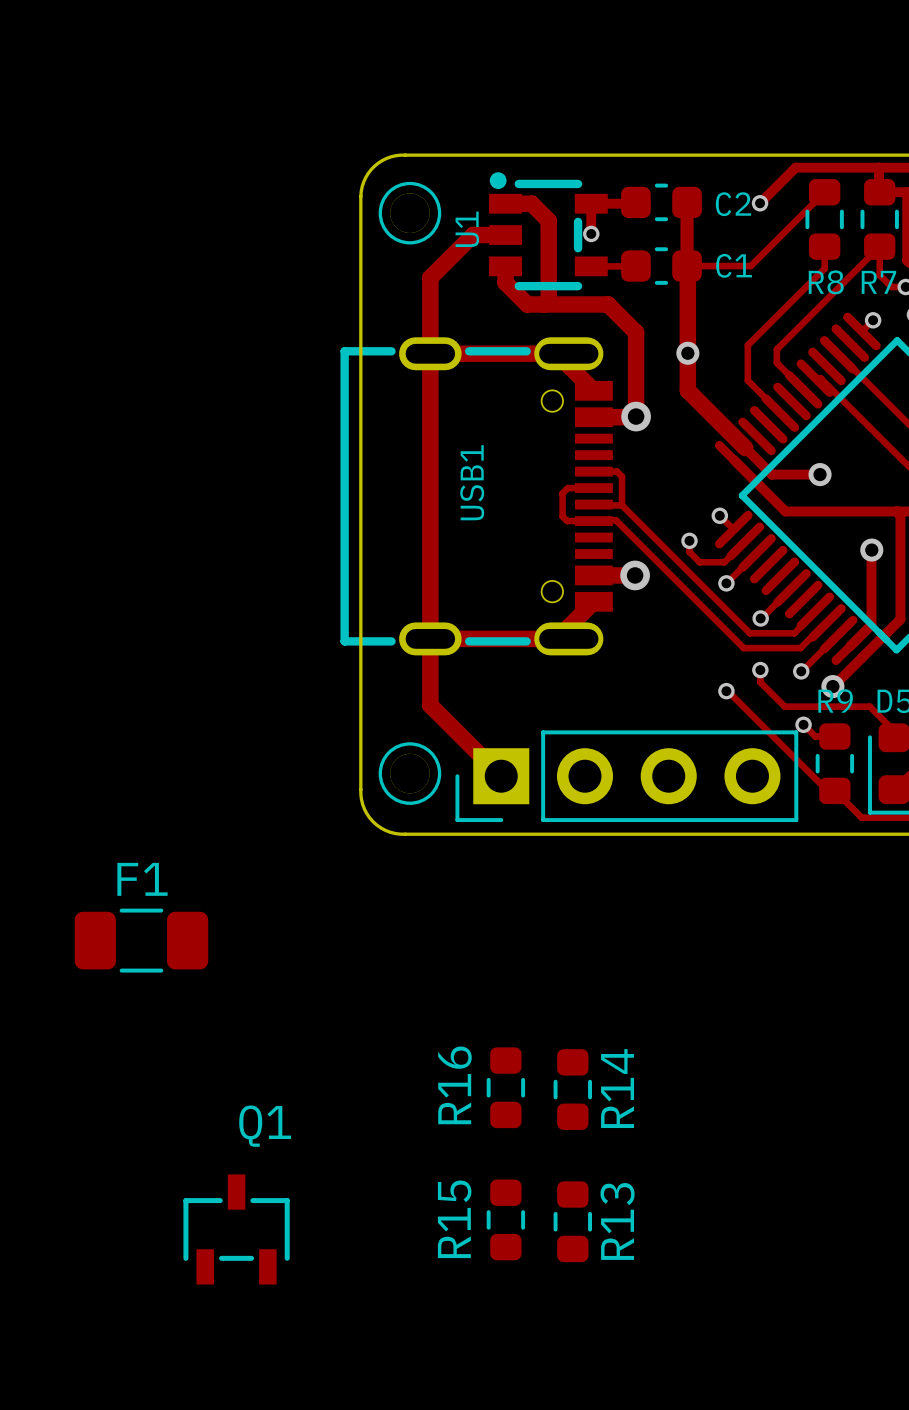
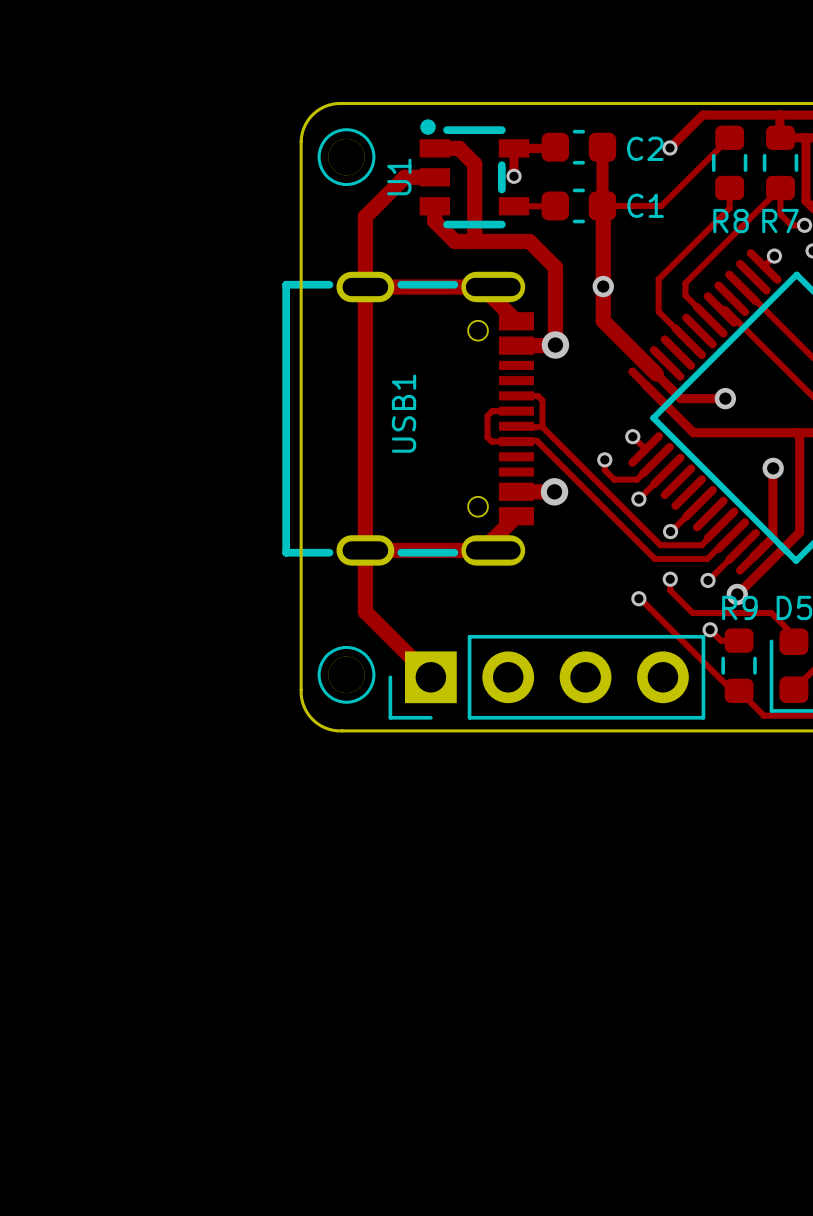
F1: (141, 940) -> none
R16: (505, 1087) -> none
R14: (572, 1089) -> none
R15: (505, 1219) -> none
R13: (572, 1221) -> none
Q1: (236, 1229) -> none

